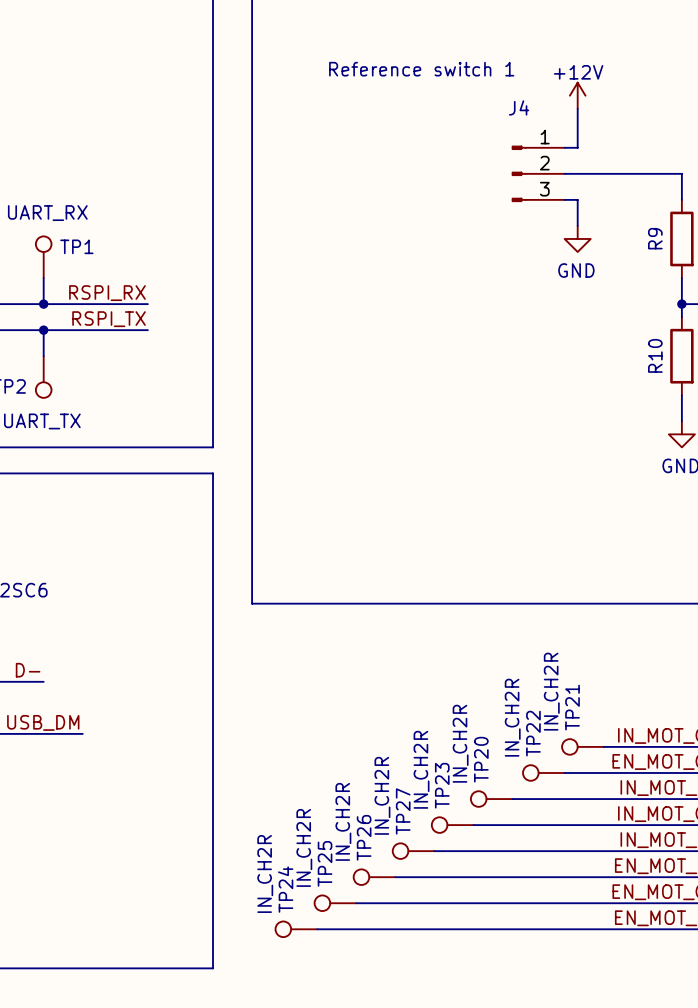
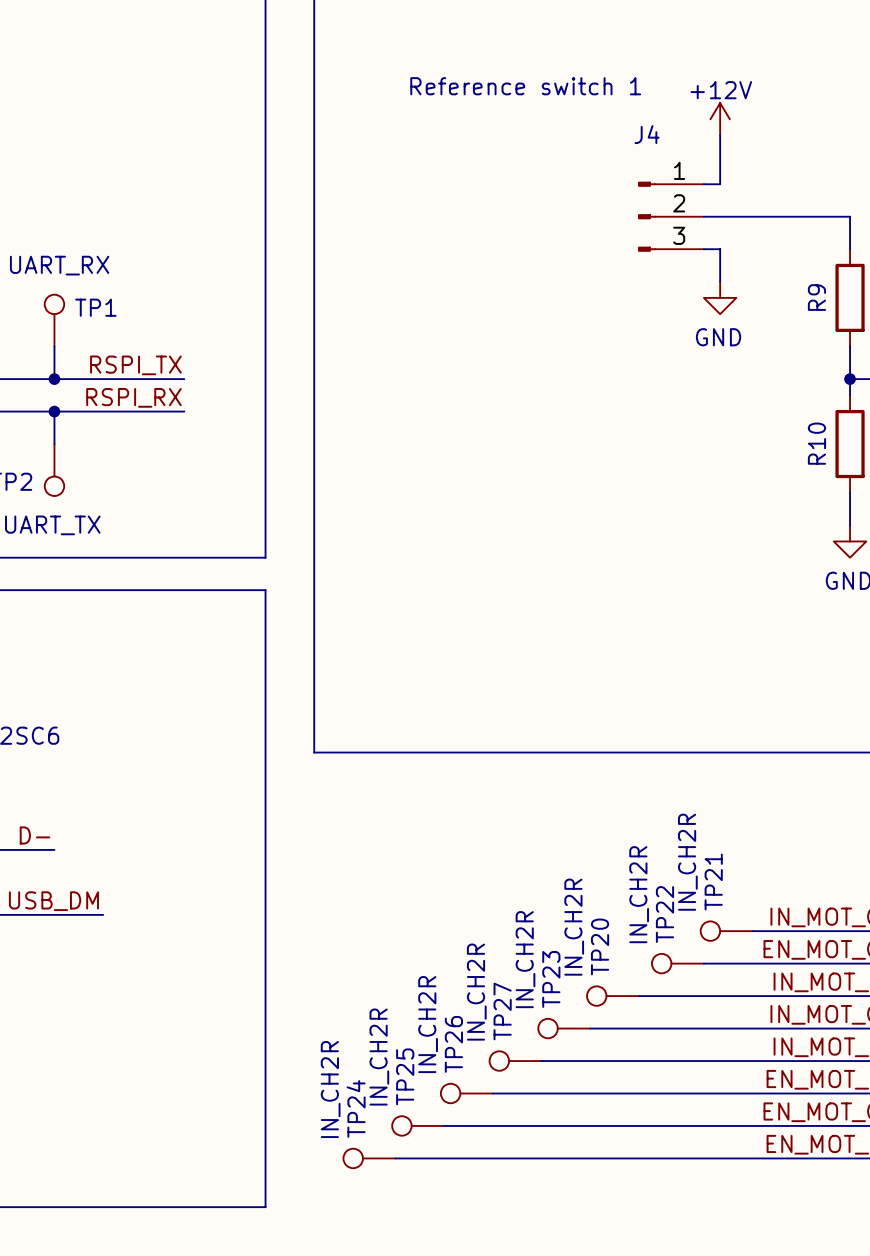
label: RSPI_RX (107, 293) -> RSPI_TX (135, 365)
label: RSPI_TX (109, 319) -> RSPI_RX (133, 397)

